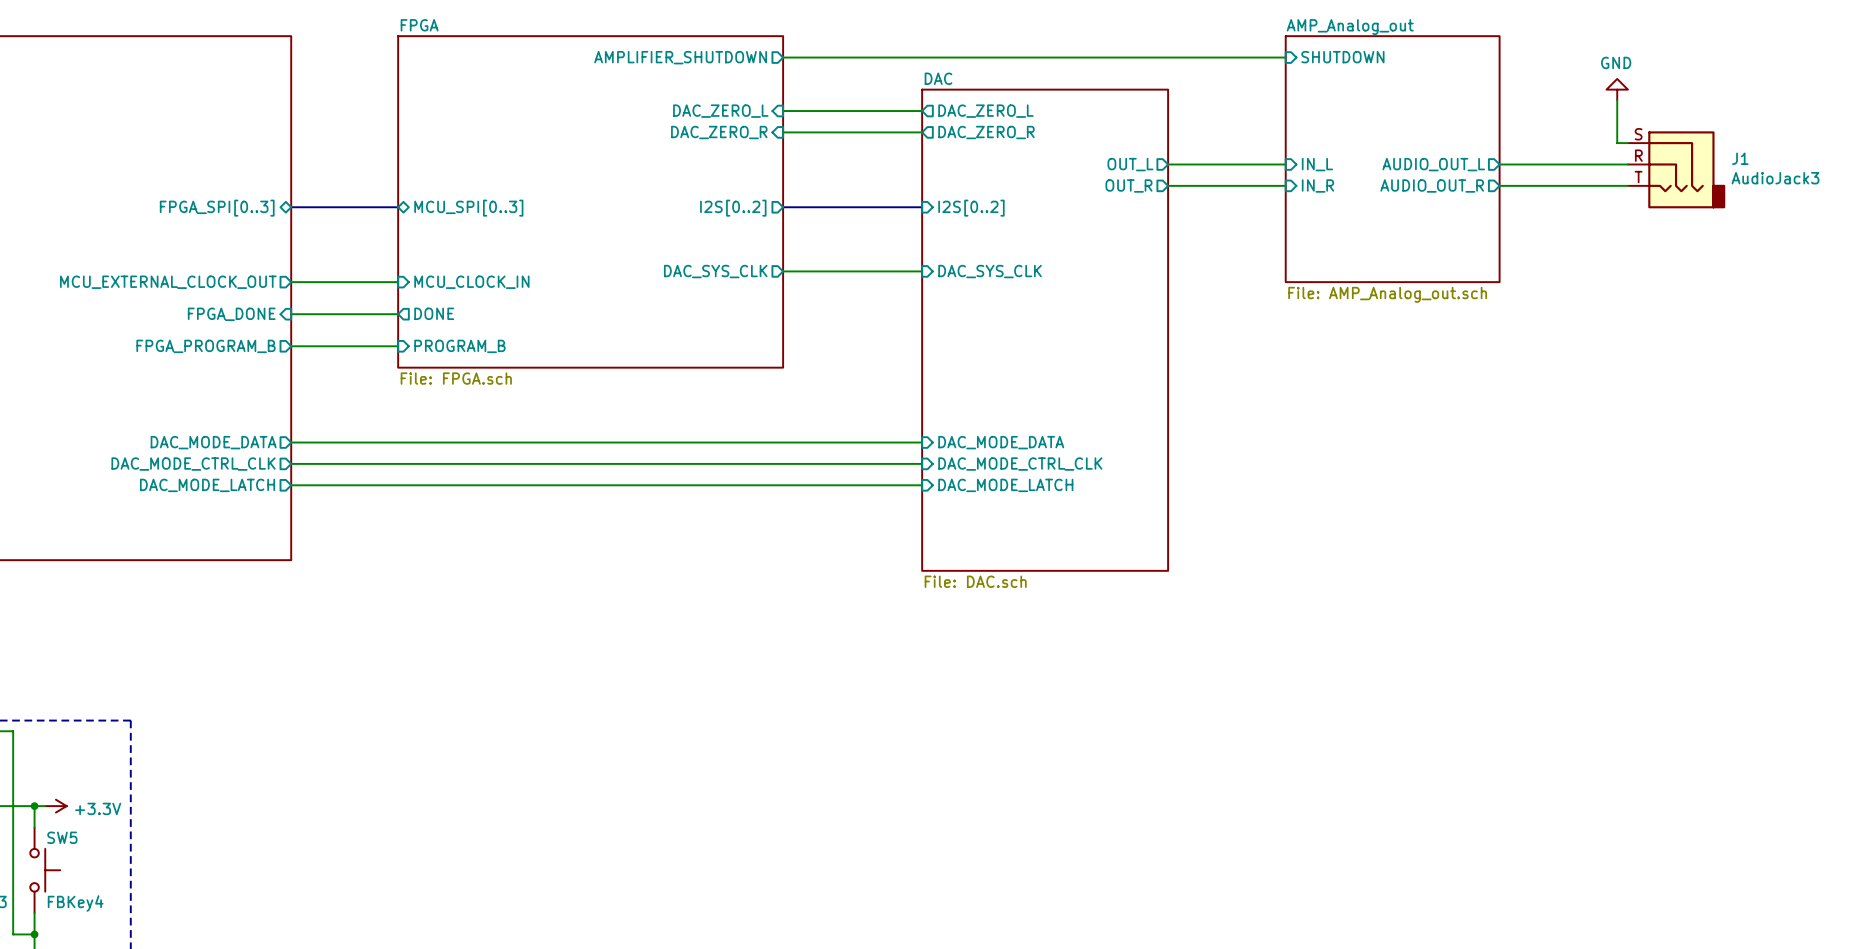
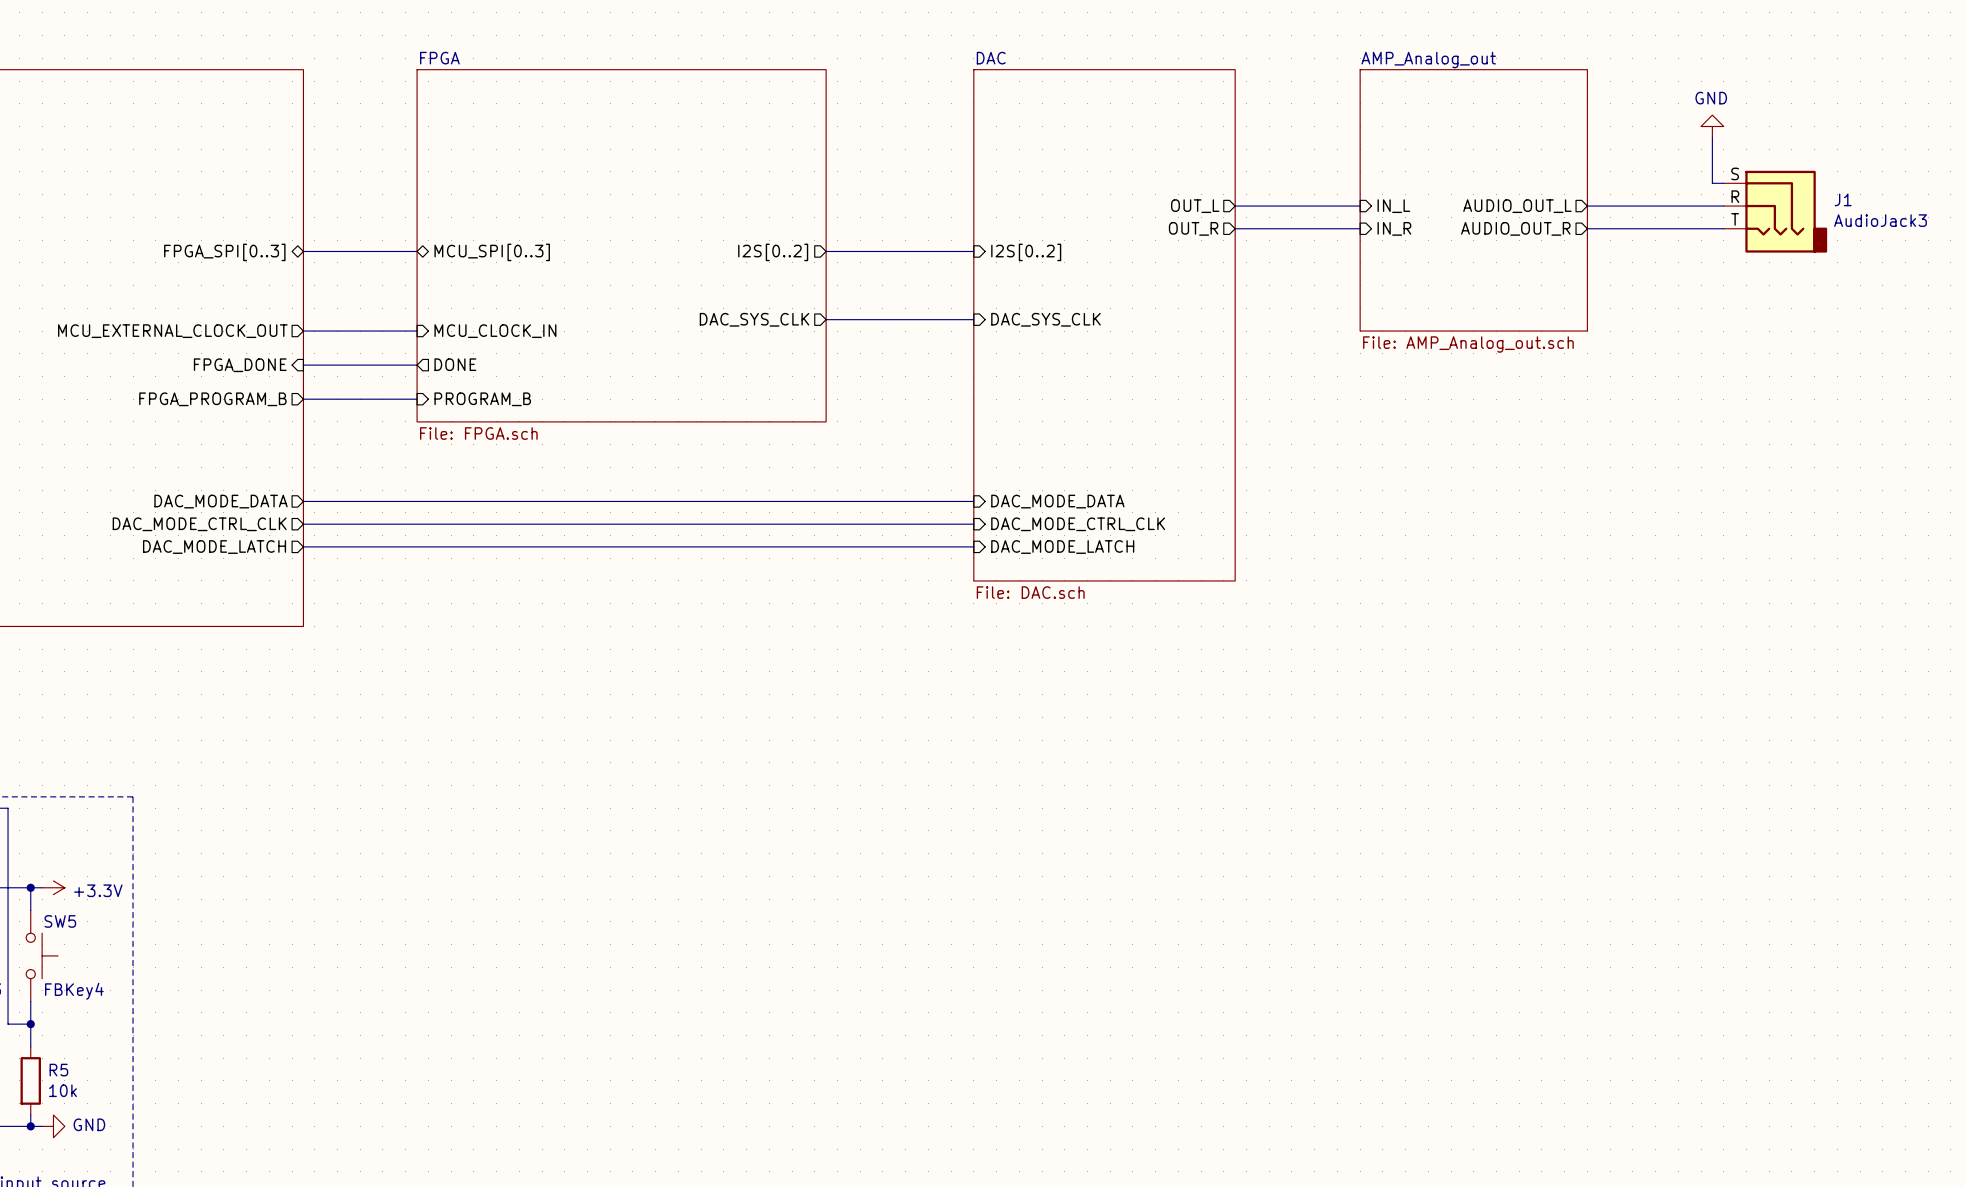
sheet pin: AMPLIFIER_SHUTDOWN (680, 57) -> none
wire: (783, 57) (1285, 57) -> none
sheet pin: SHUTDOWN (1342, 57) -> none
sheet pin: DAC_ZERO_L (720, 111) -> none
wire: (783, 111) (922, 111) -> none
sheet pin: DAC_ZERO_L (985, 111) -> none
sheet pin: DAC_ZERO_R (719, 132) -> none
wire: (783, 132) (922, 132) -> none
sheet pin: DAC_ZERO_R (986, 132) -> none
sheet DAC position: (1045, 330) -> (1104, 325)

